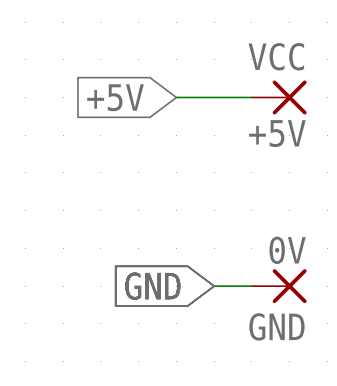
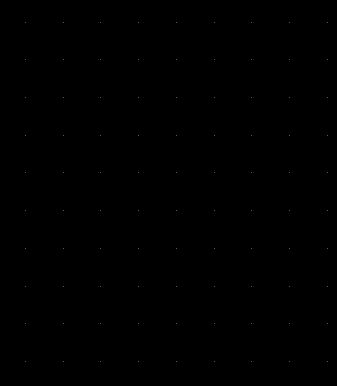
global label: +5V (115, 97) -> none
wire: (176, 97) (251, 97) -> none
VCC: +5V (279, 97) -> none
global label: GND (152, 286) -> none
wire: (214, 286) (251, 286) -> none
GND: 0V (279, 286) -> none

